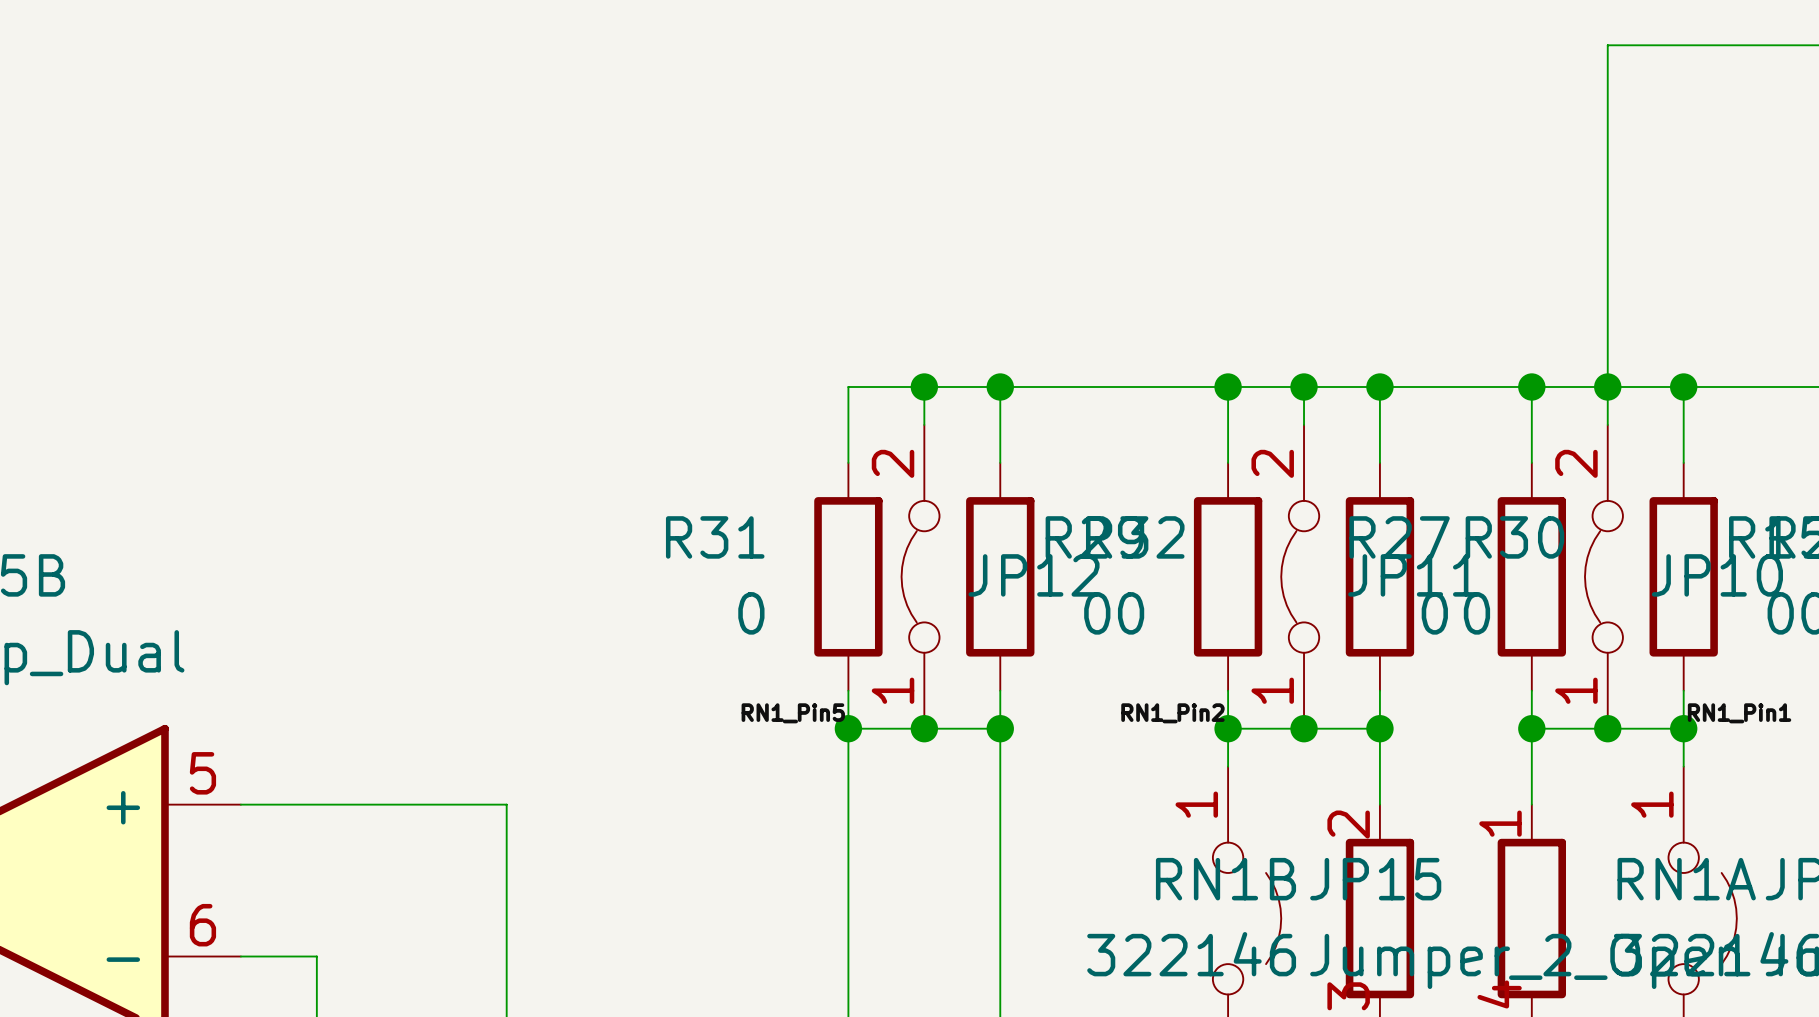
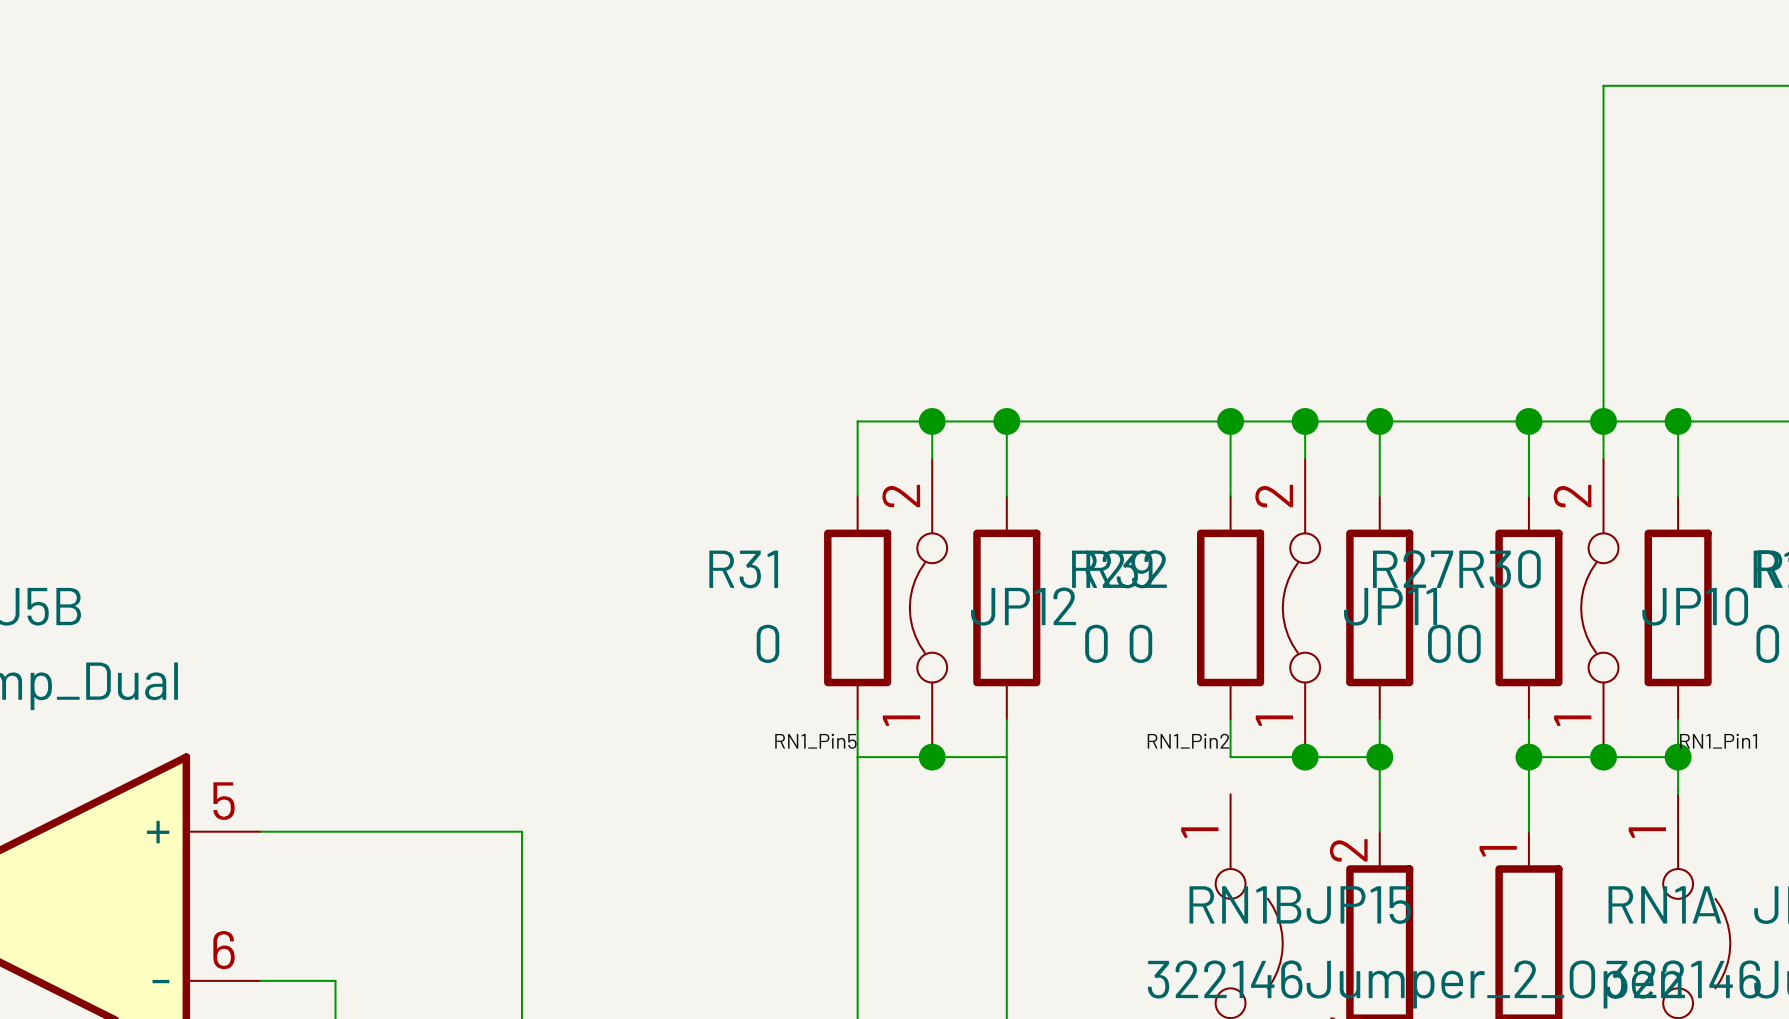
junction: (848, 728) -> none
junction: (1000, 728) -> none
wire: (1228, 728) (1228, 766) -> none
junction: (1228, 728) -> none

